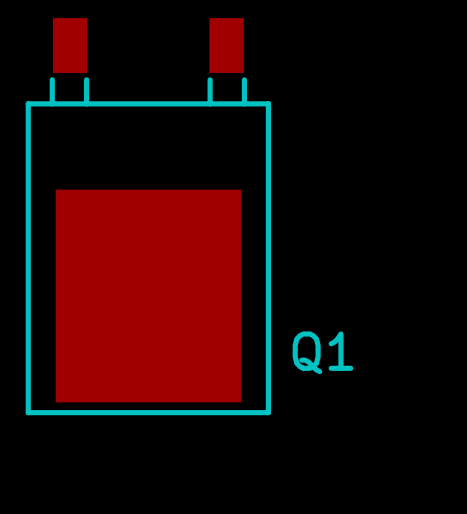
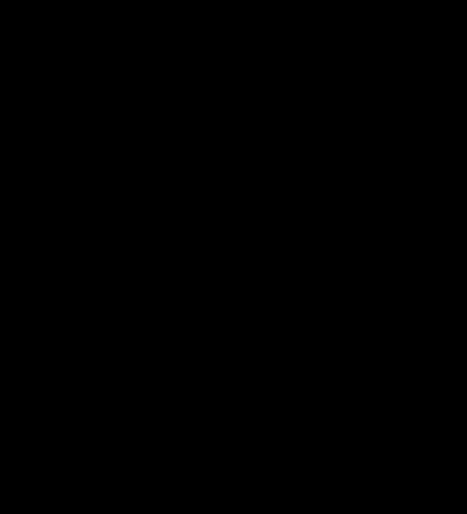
Q1: (148, 216) -> none

